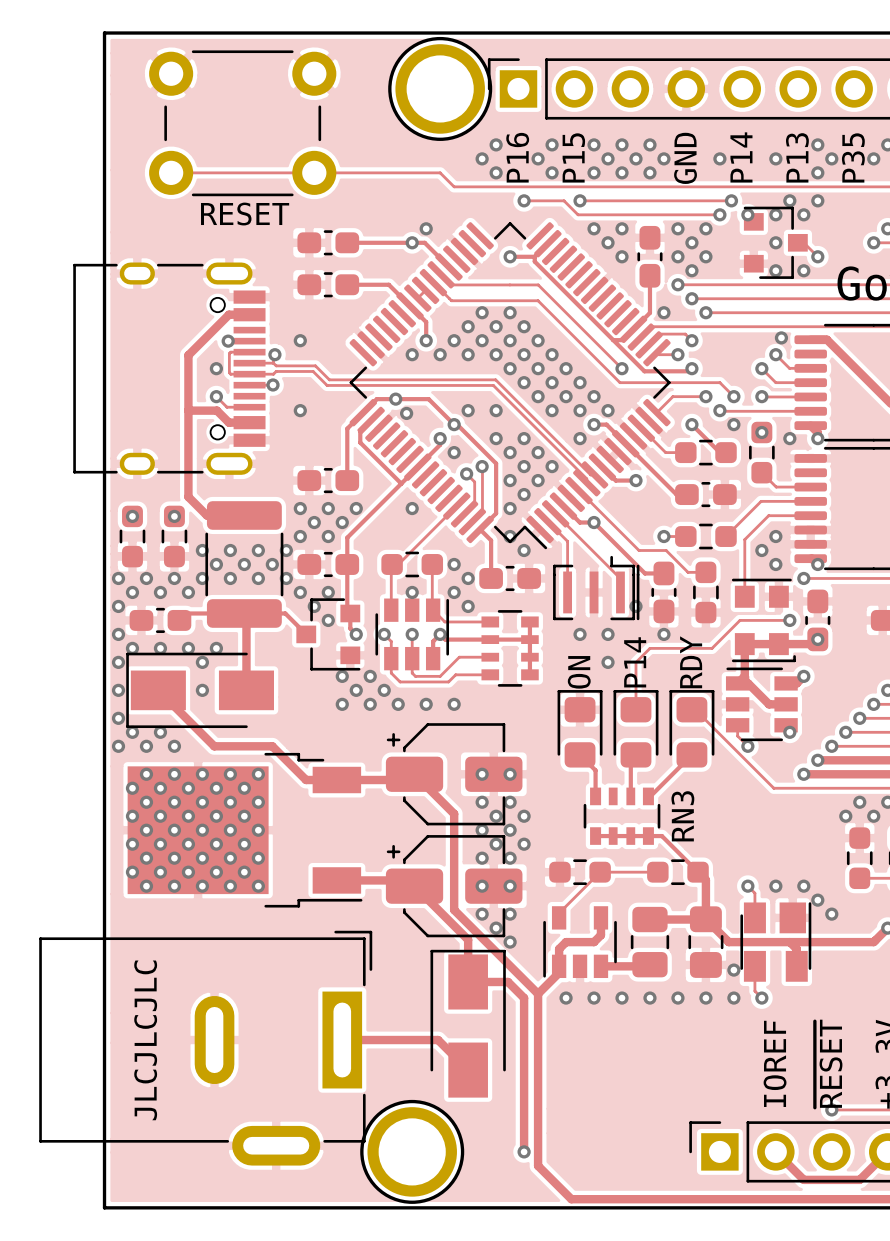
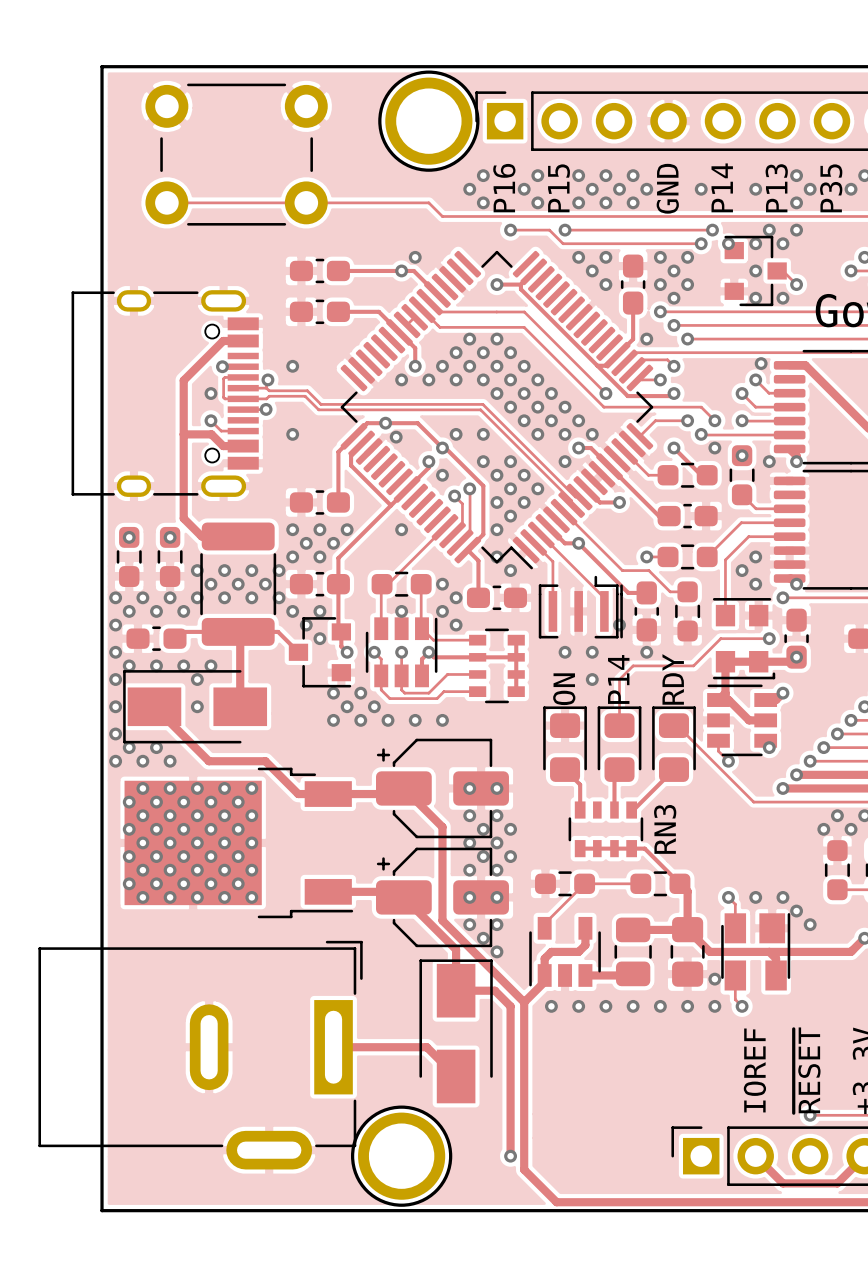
text: RESET (245, 214) -> none
text: JLCJLCJLC (145, 1040) -> none

